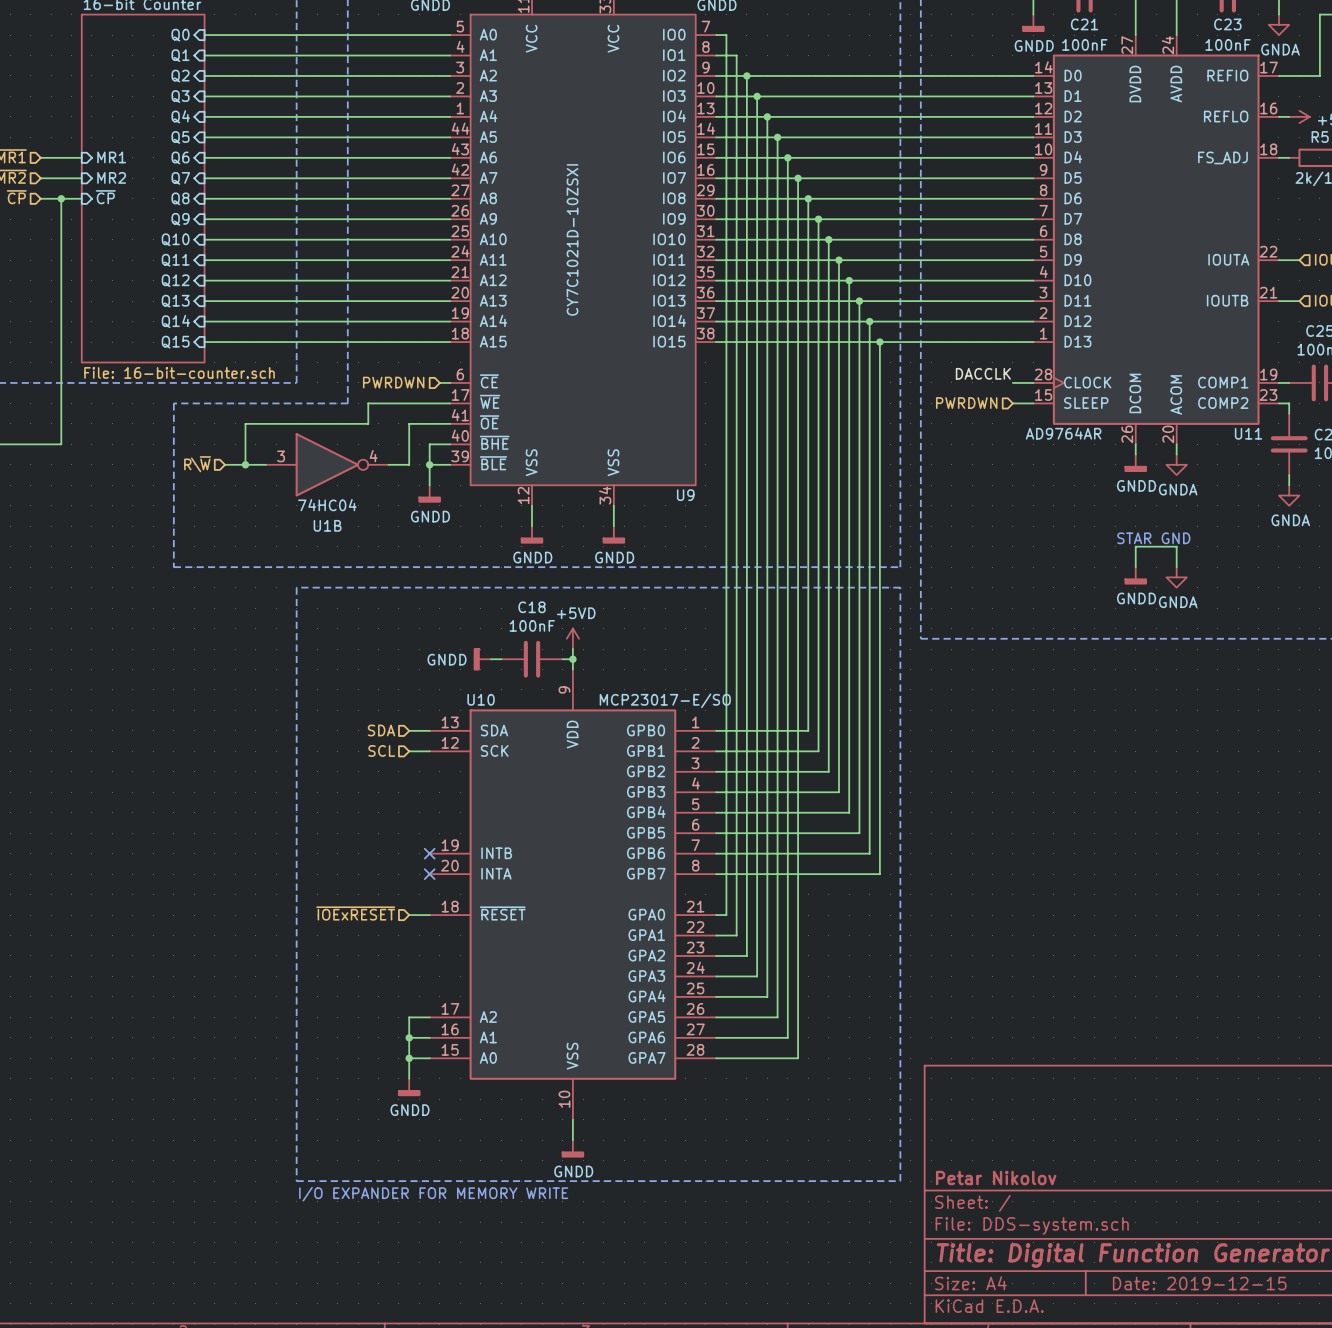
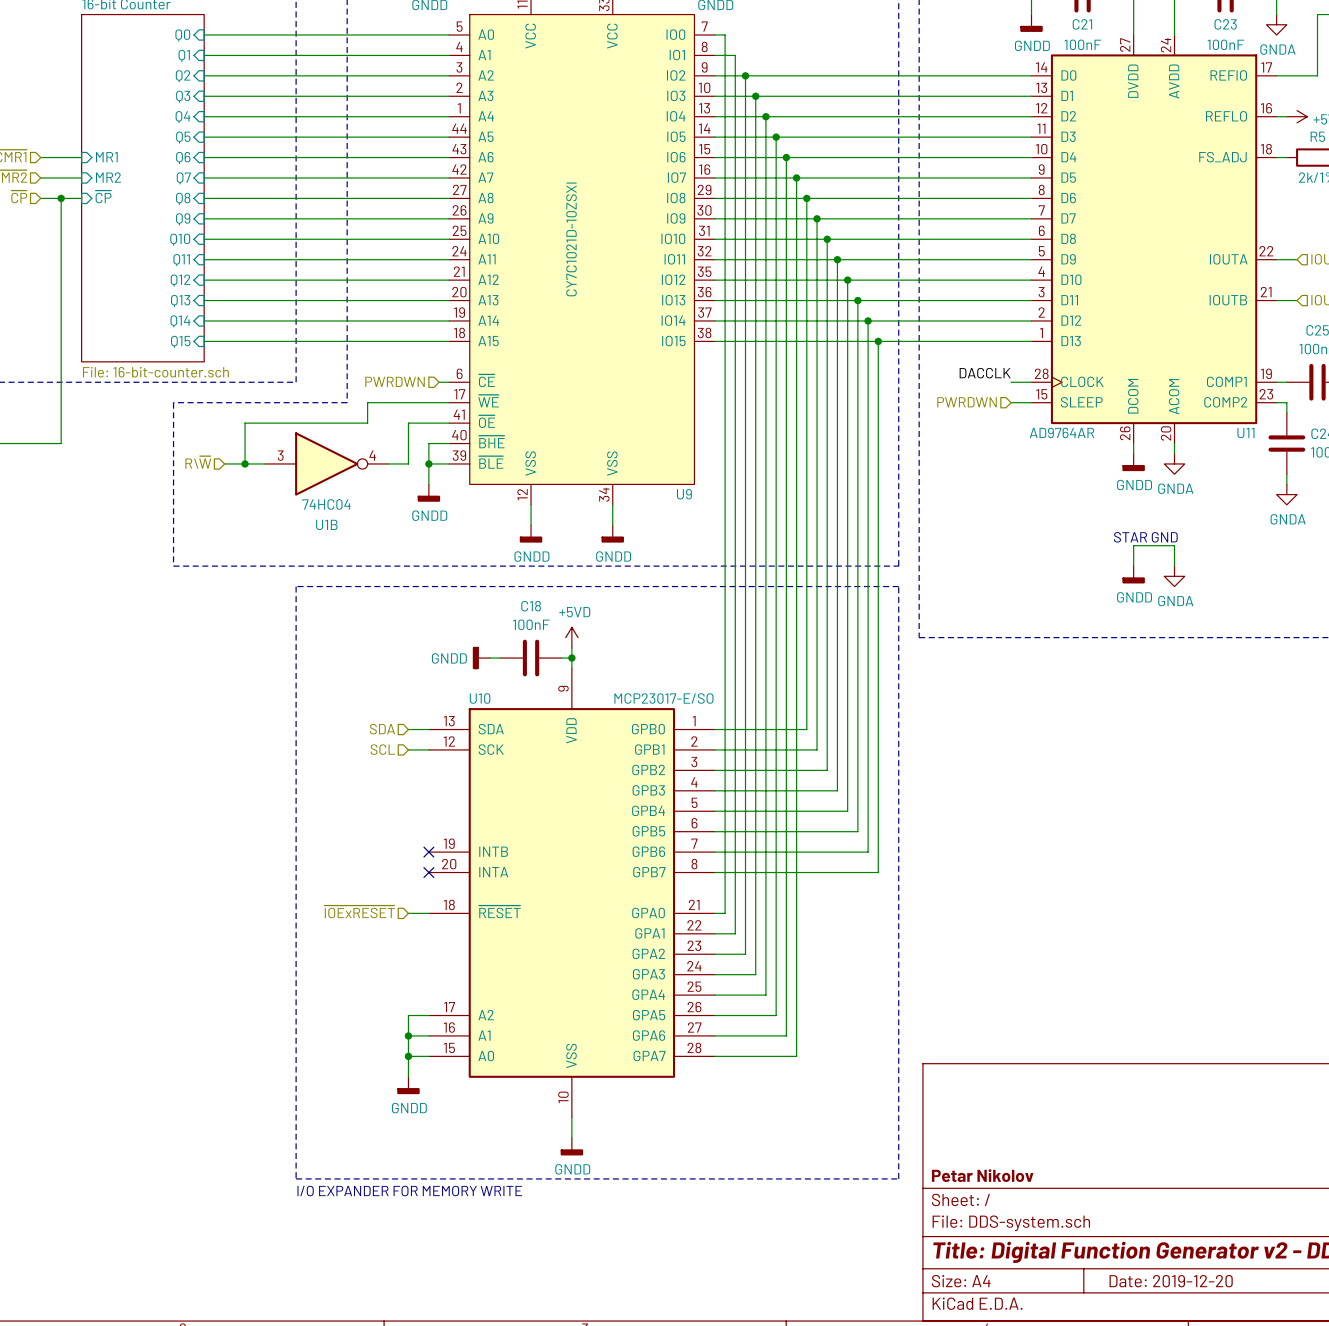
title block: Date: 2019-12-15 (1199, 1283) -> Date: 2019-12-20 (1171, 1281)

